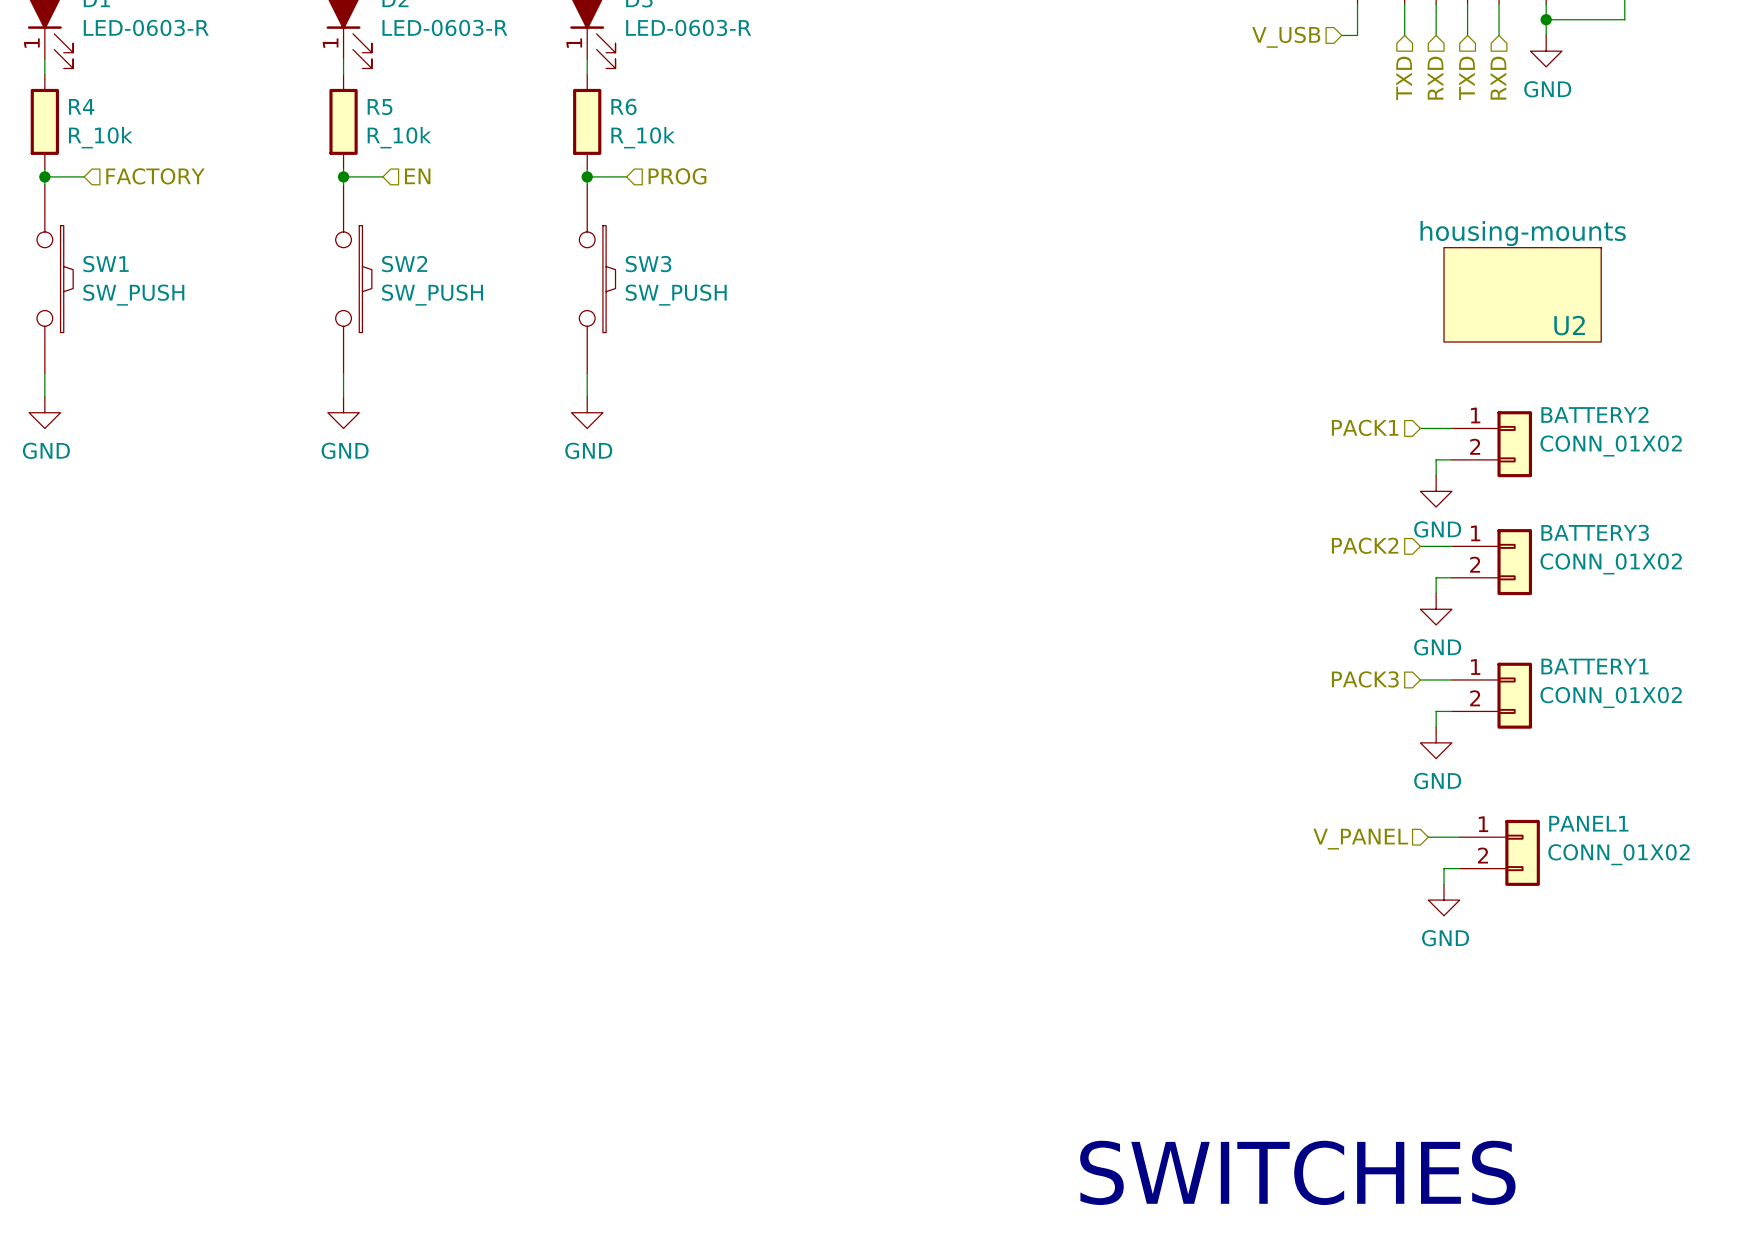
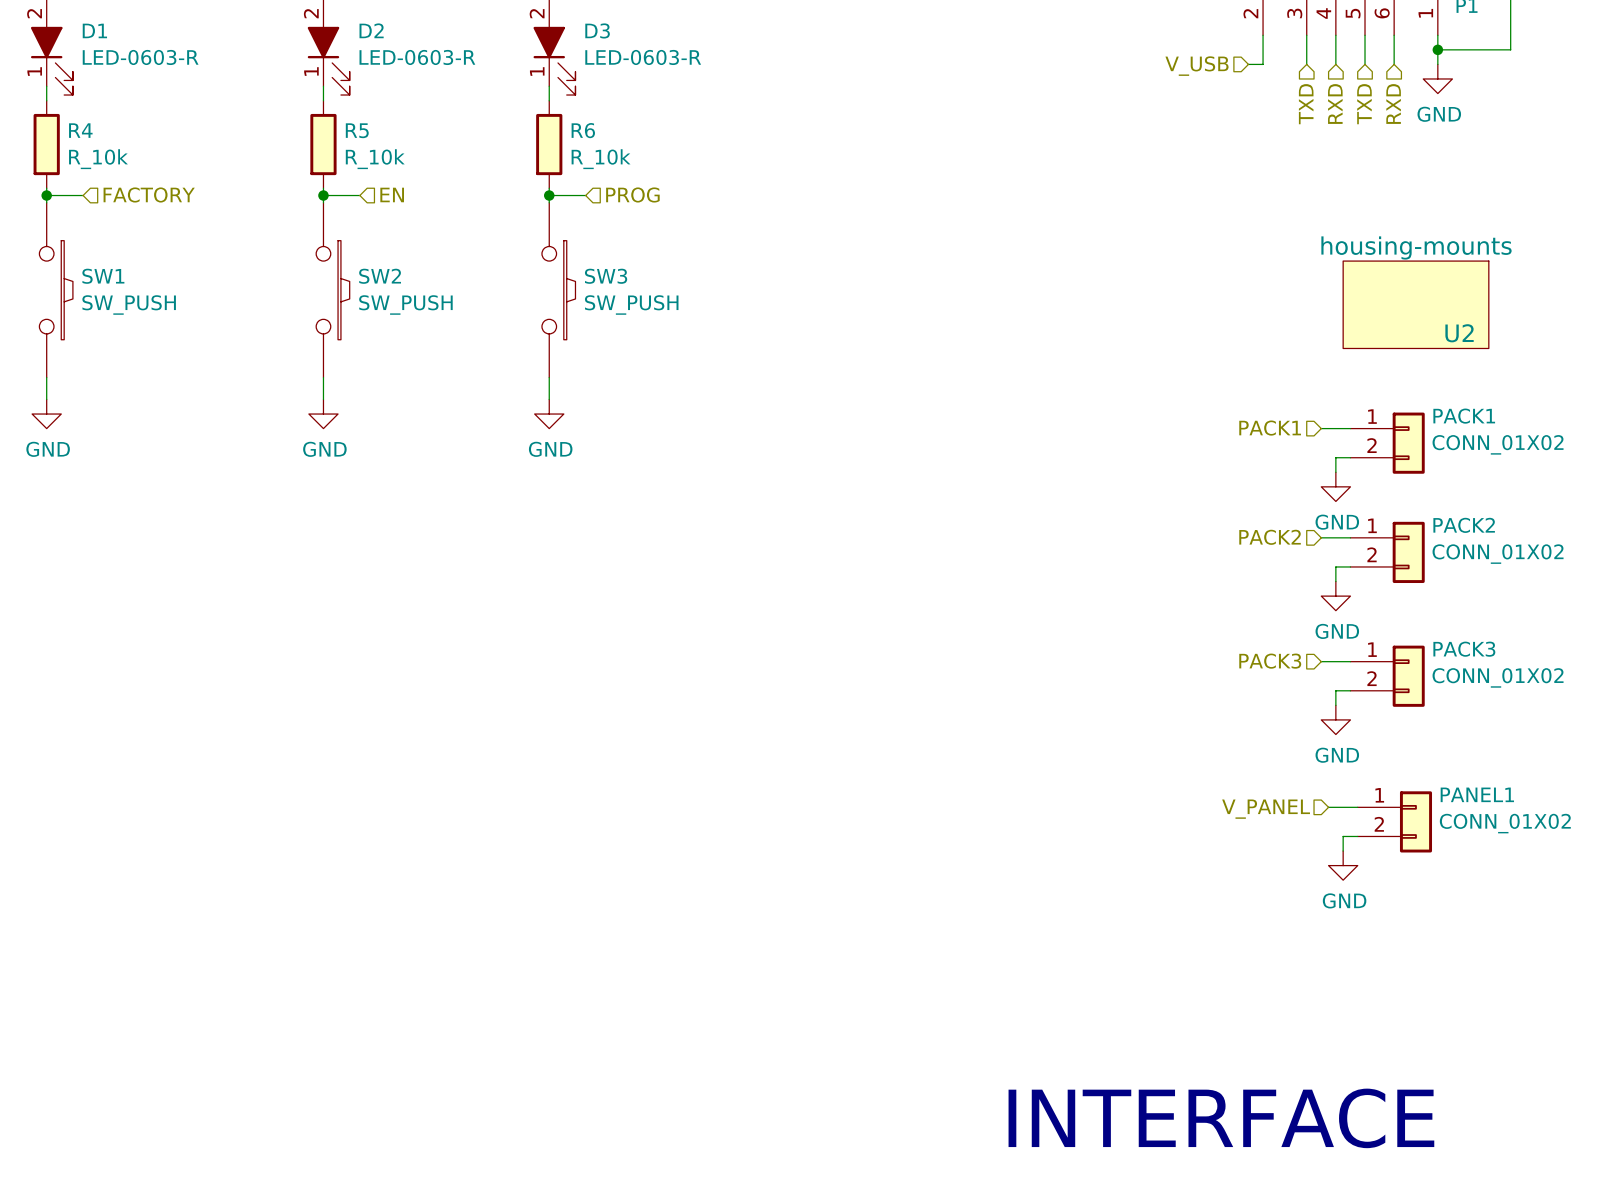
BATTERY2 name: BATTERY2 (1594, 414) -> PACK1 (1464, 416)
BATTERY3 name: BATTERY3 (1595, 532) -> PACK2 (1464, 525)
BATTERY1 name: BATTERY1 (1595, 666) -> PACK3 (1464, 649)
text: SWITCHES (1297, 1172) -> INTERFACE (1221, 1118)

